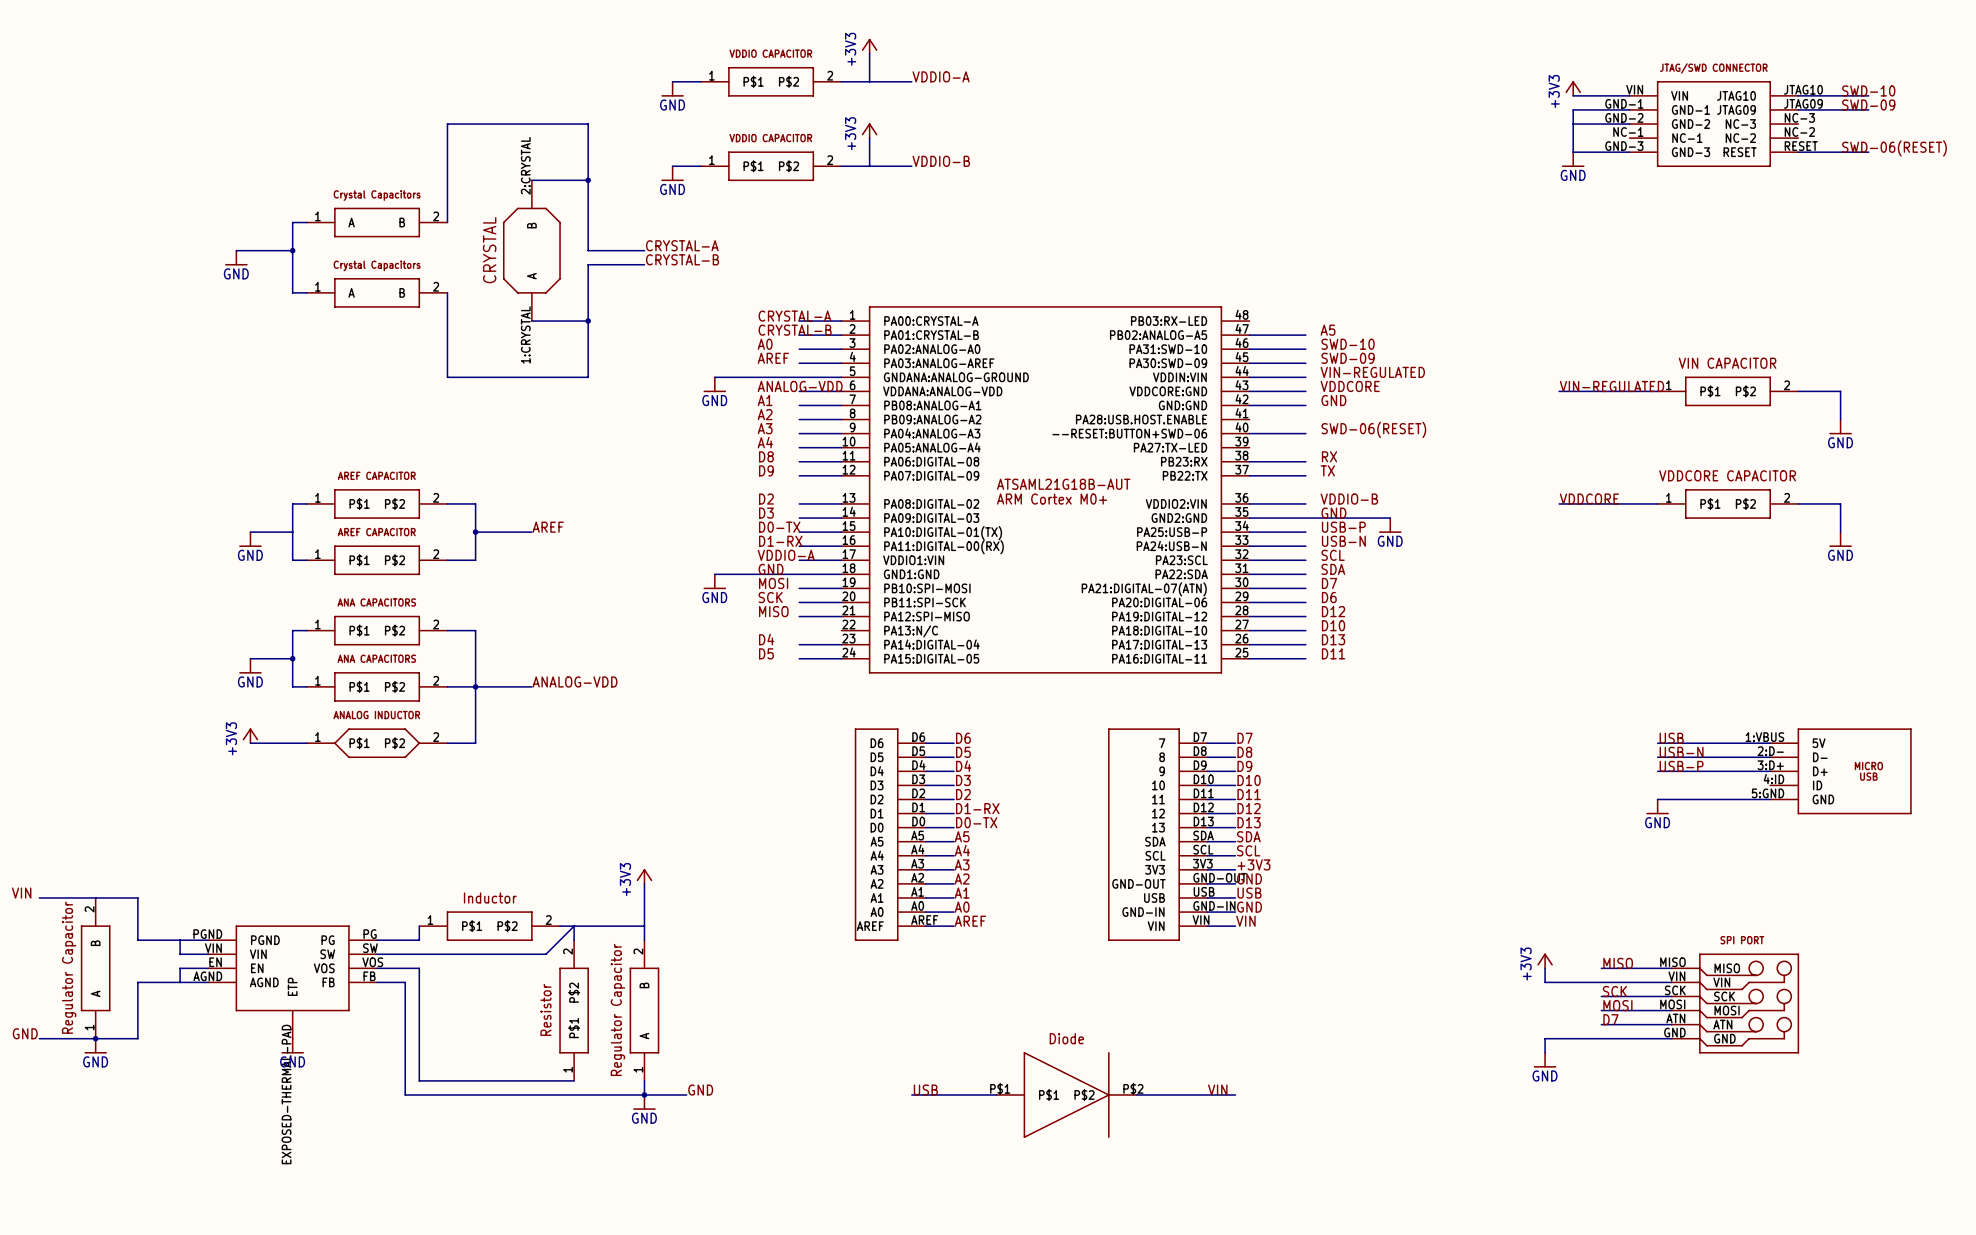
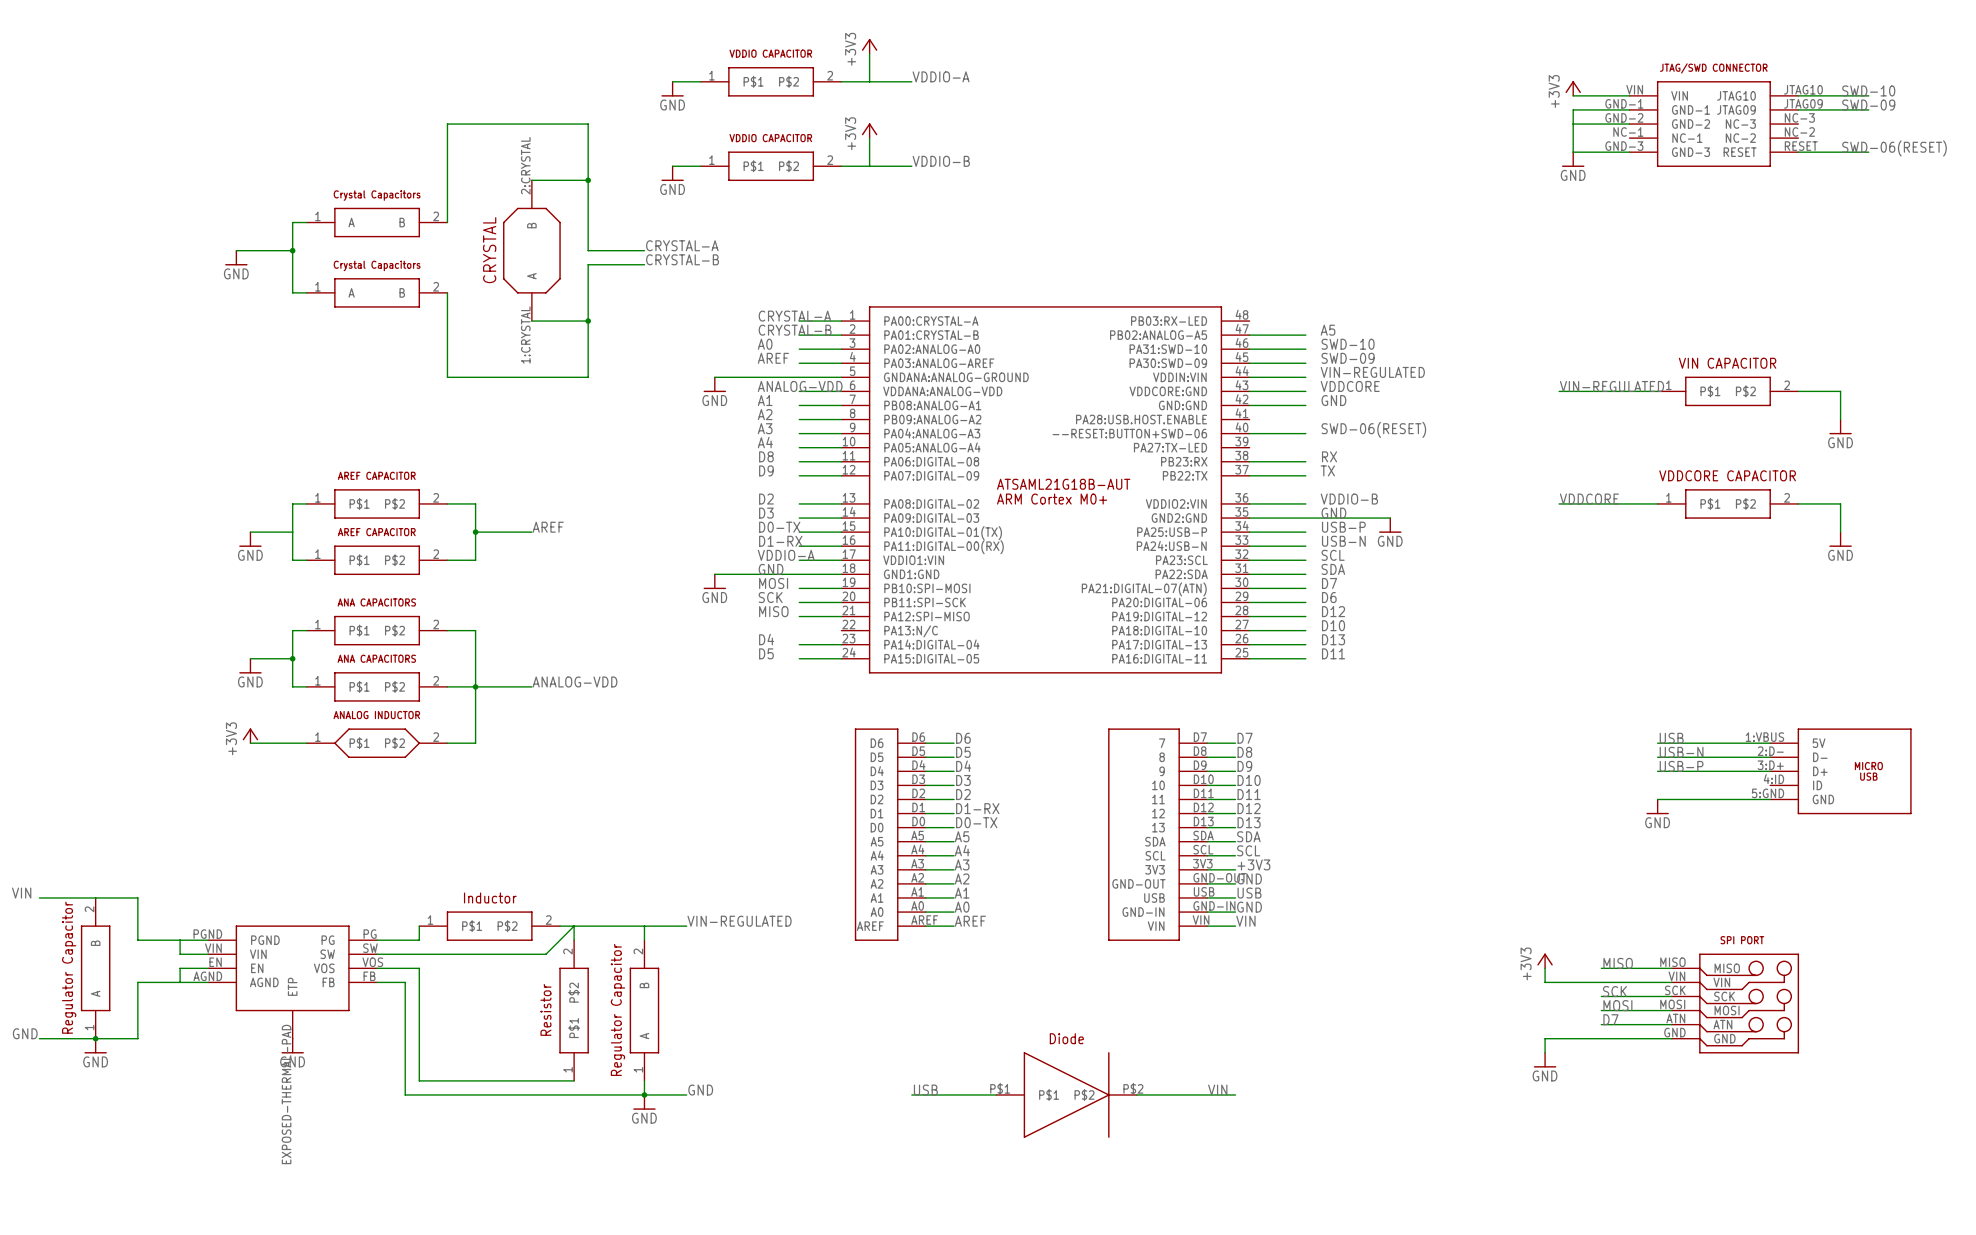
power symbol: +3V3 (644, 876) -> none
wire: (644, 883) (644, 926) -> (686, 926) (644, 926)
label: none -> VIN-REGULATED (739, 921)

